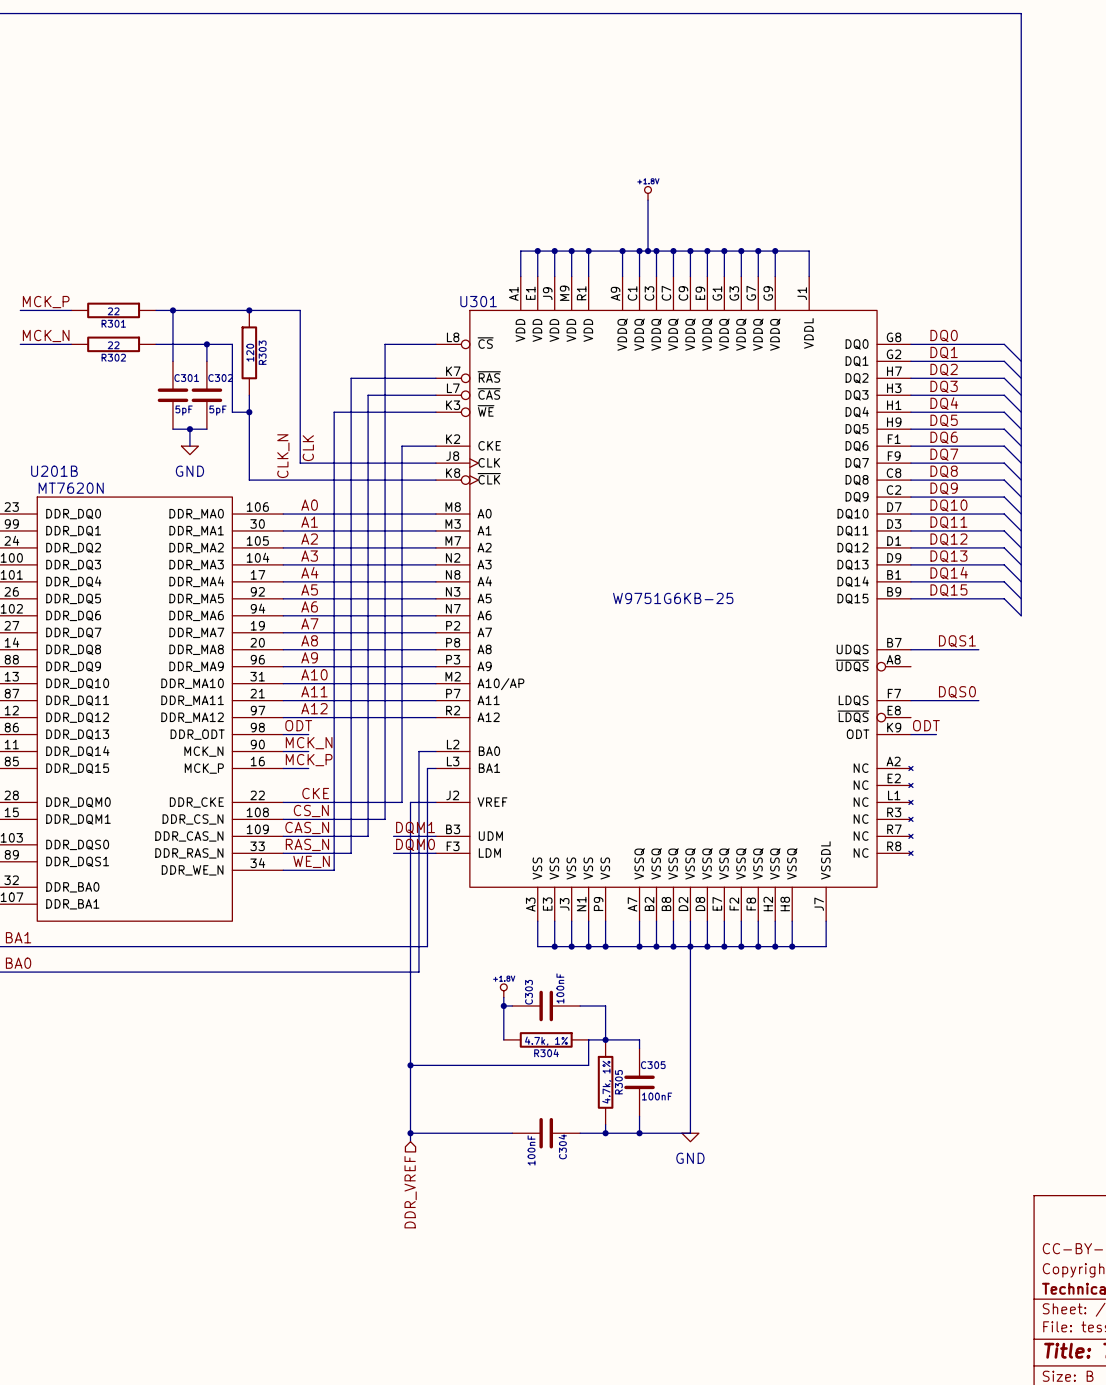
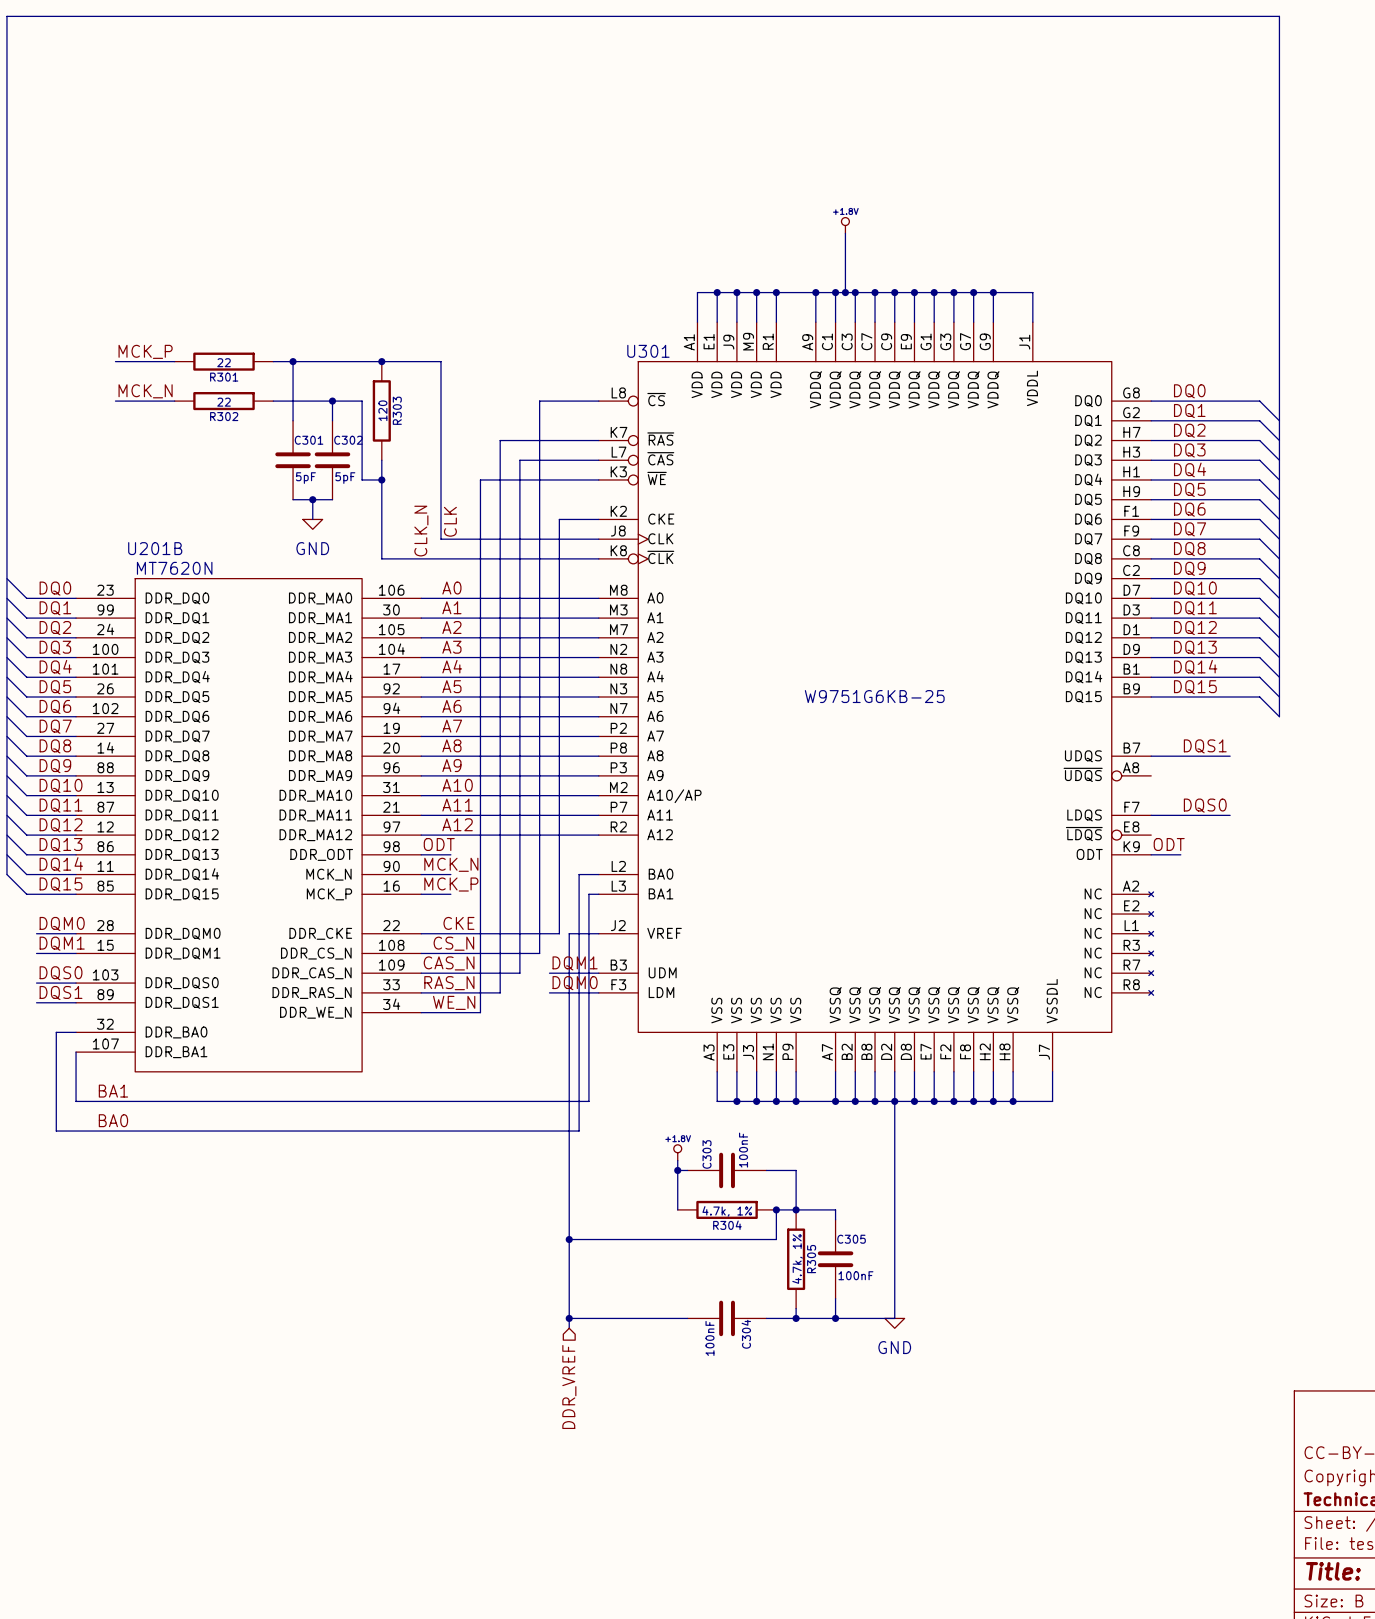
junction: none -> (776, 1209)

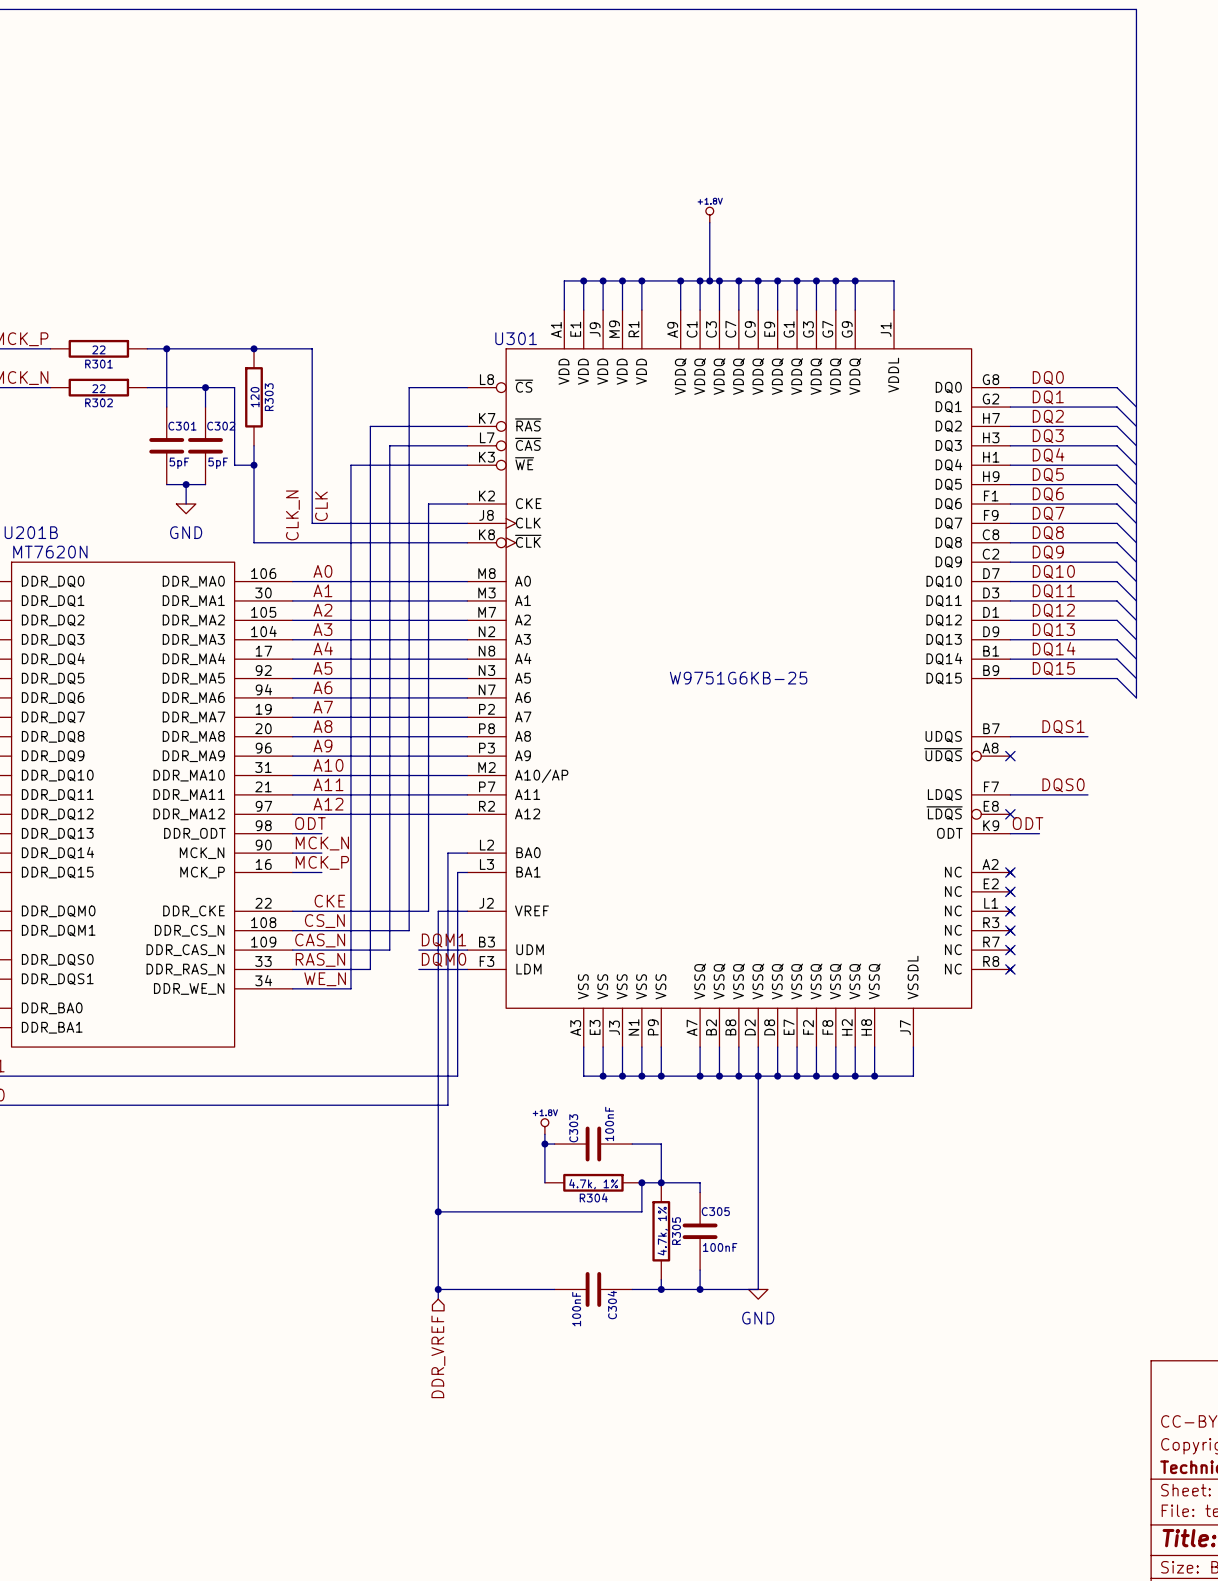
no-connect mark: none -> (1010, 756)
no-connect mark: none -> (1010, 814)
no-connect mark: none -> (1010, 872)
no-connect mark: none -> (1010, 891)
no-connect mark: none -> (1010, 911)
no-connect mark: none -> (1010, 930)
no-connect mark: none -> (1010, 950)
no-connect mark: none -> (1010, 969)

